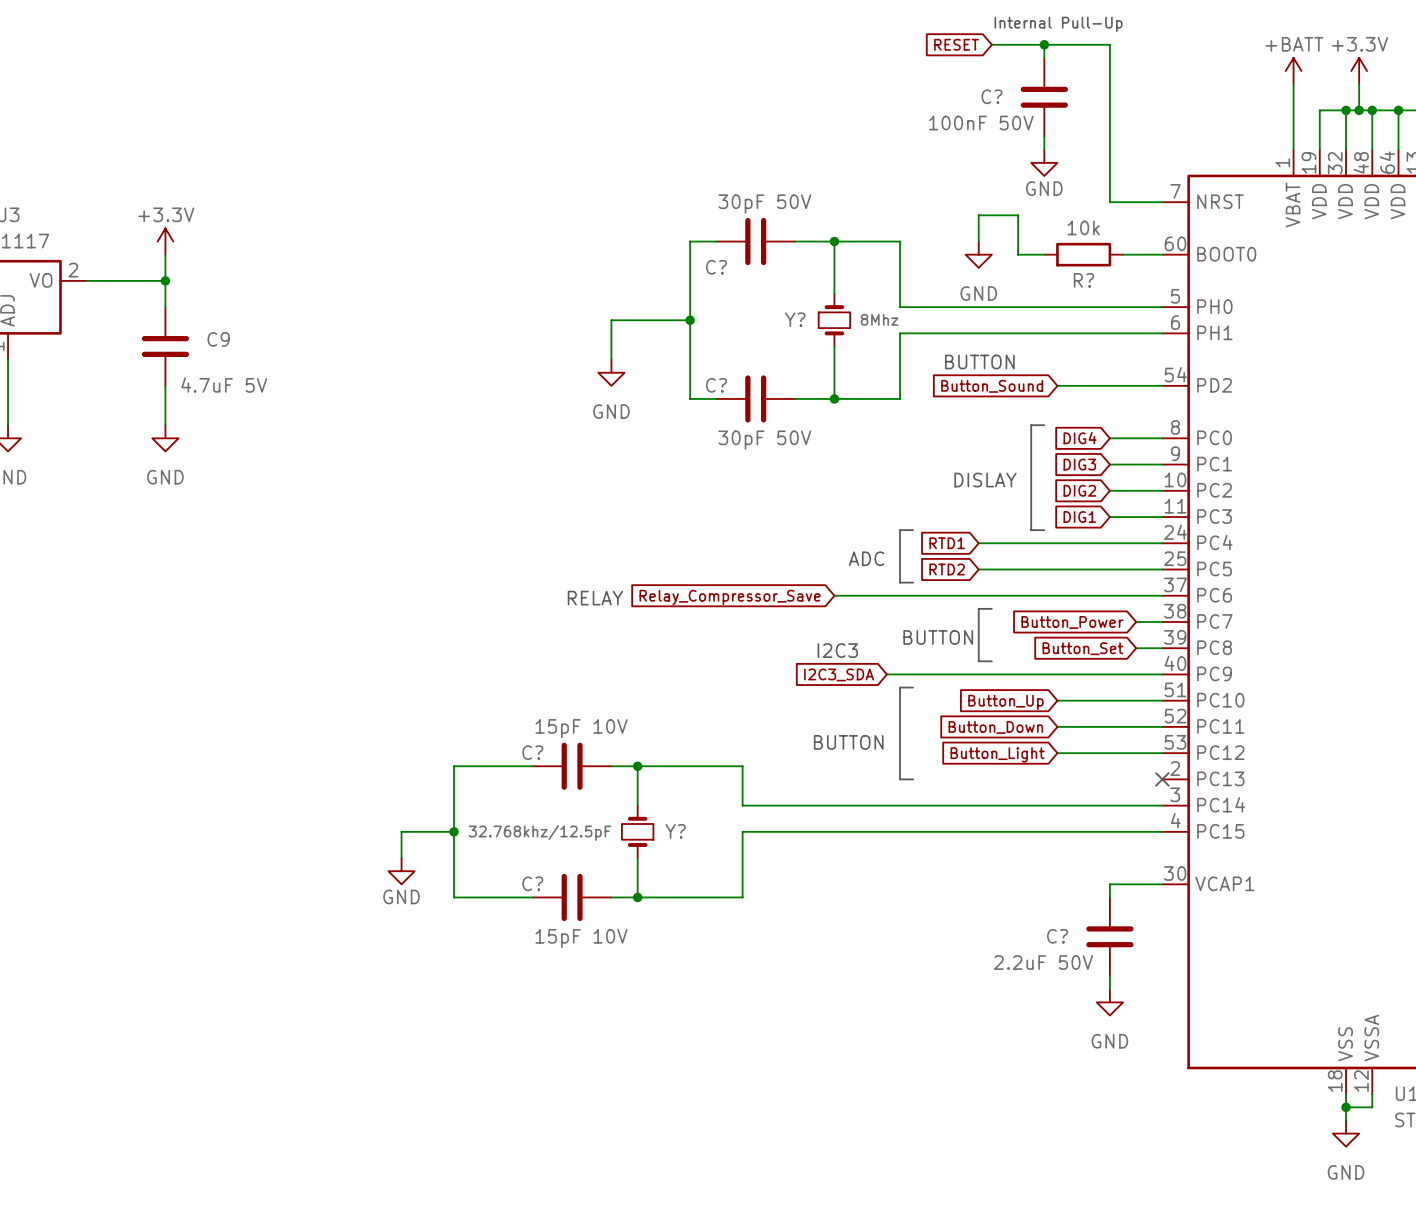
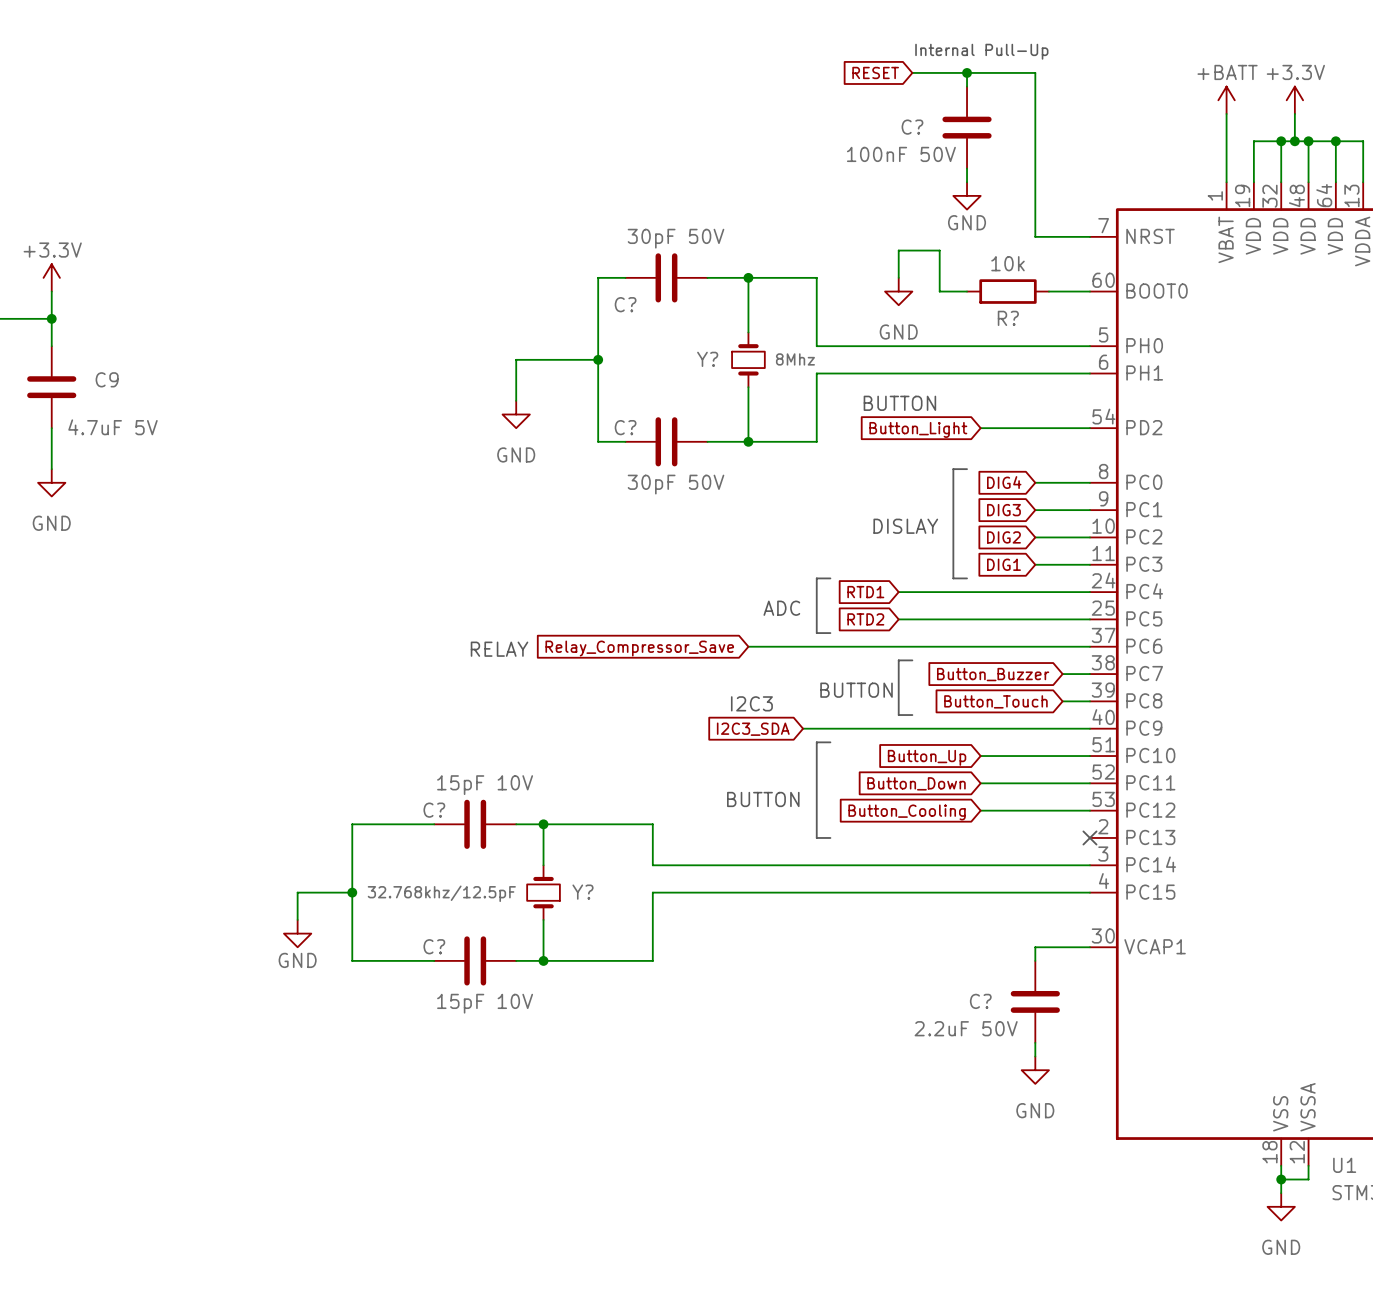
global label: Button_Sound (992, 386) -> Button_Light (918, 429)
global label: Button_Power (1072, 622) -> Button_Buzzer (993, 674)
global label: Button_Set (1082, 648) -> Button_Touch (995, 701)
global label: Button_Light (997, 754) -> Button_Cooling (907, 812)

